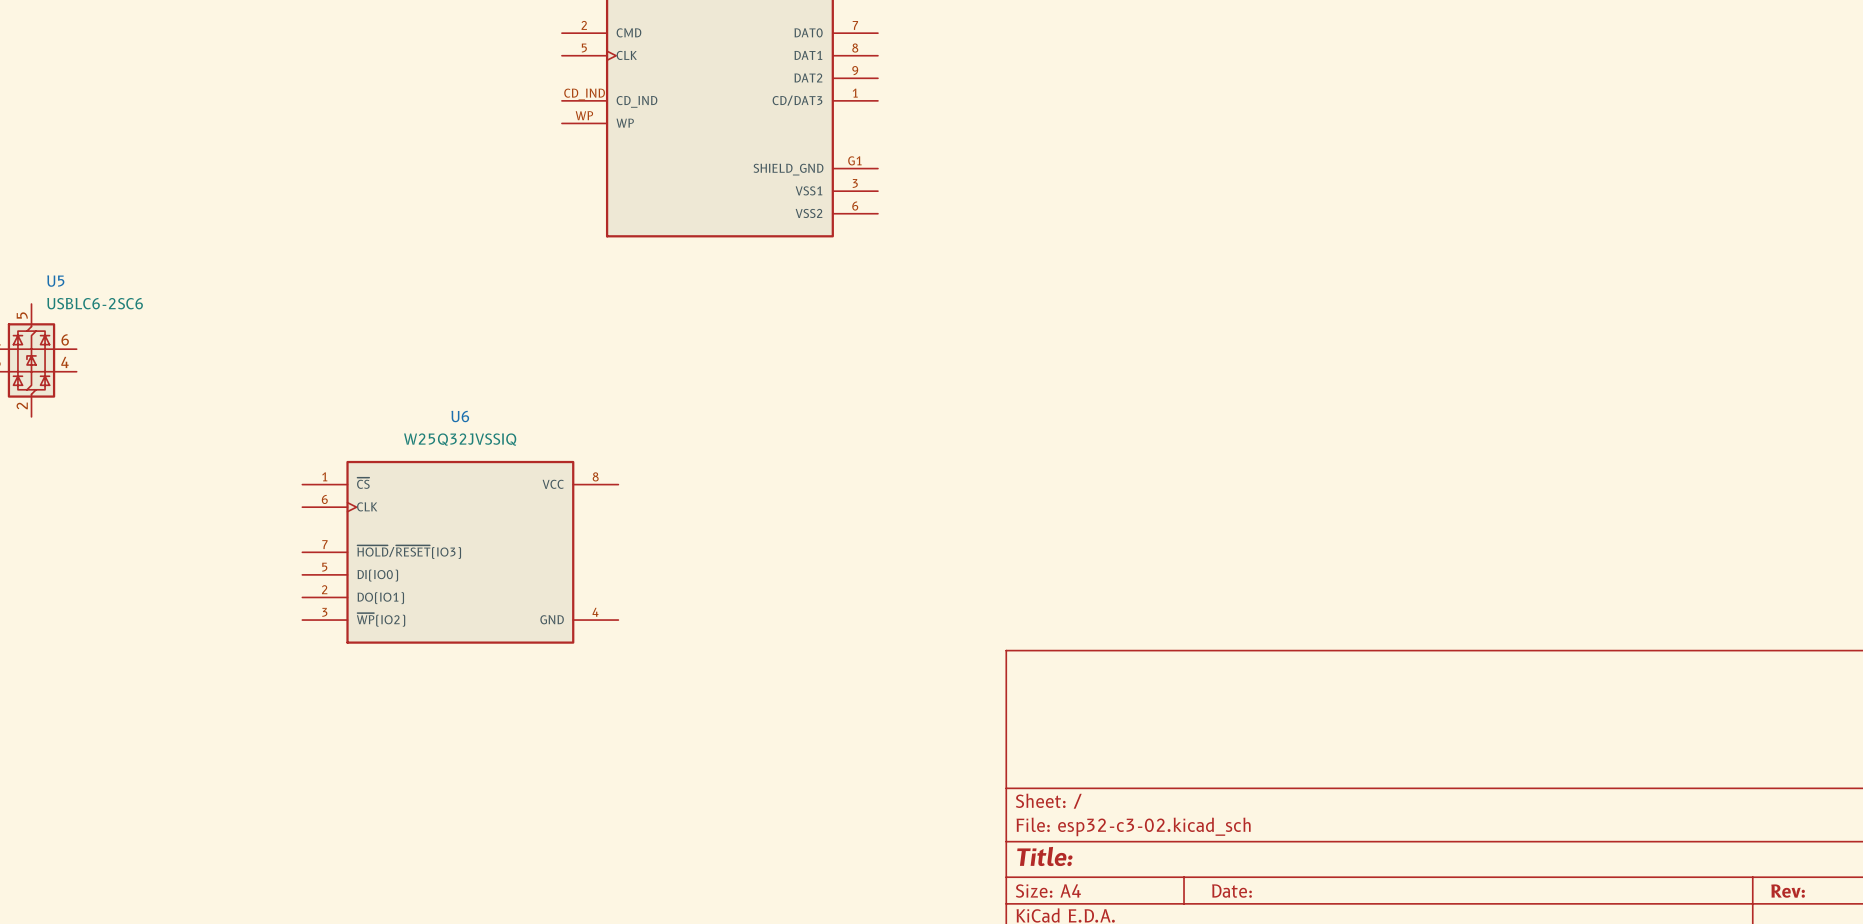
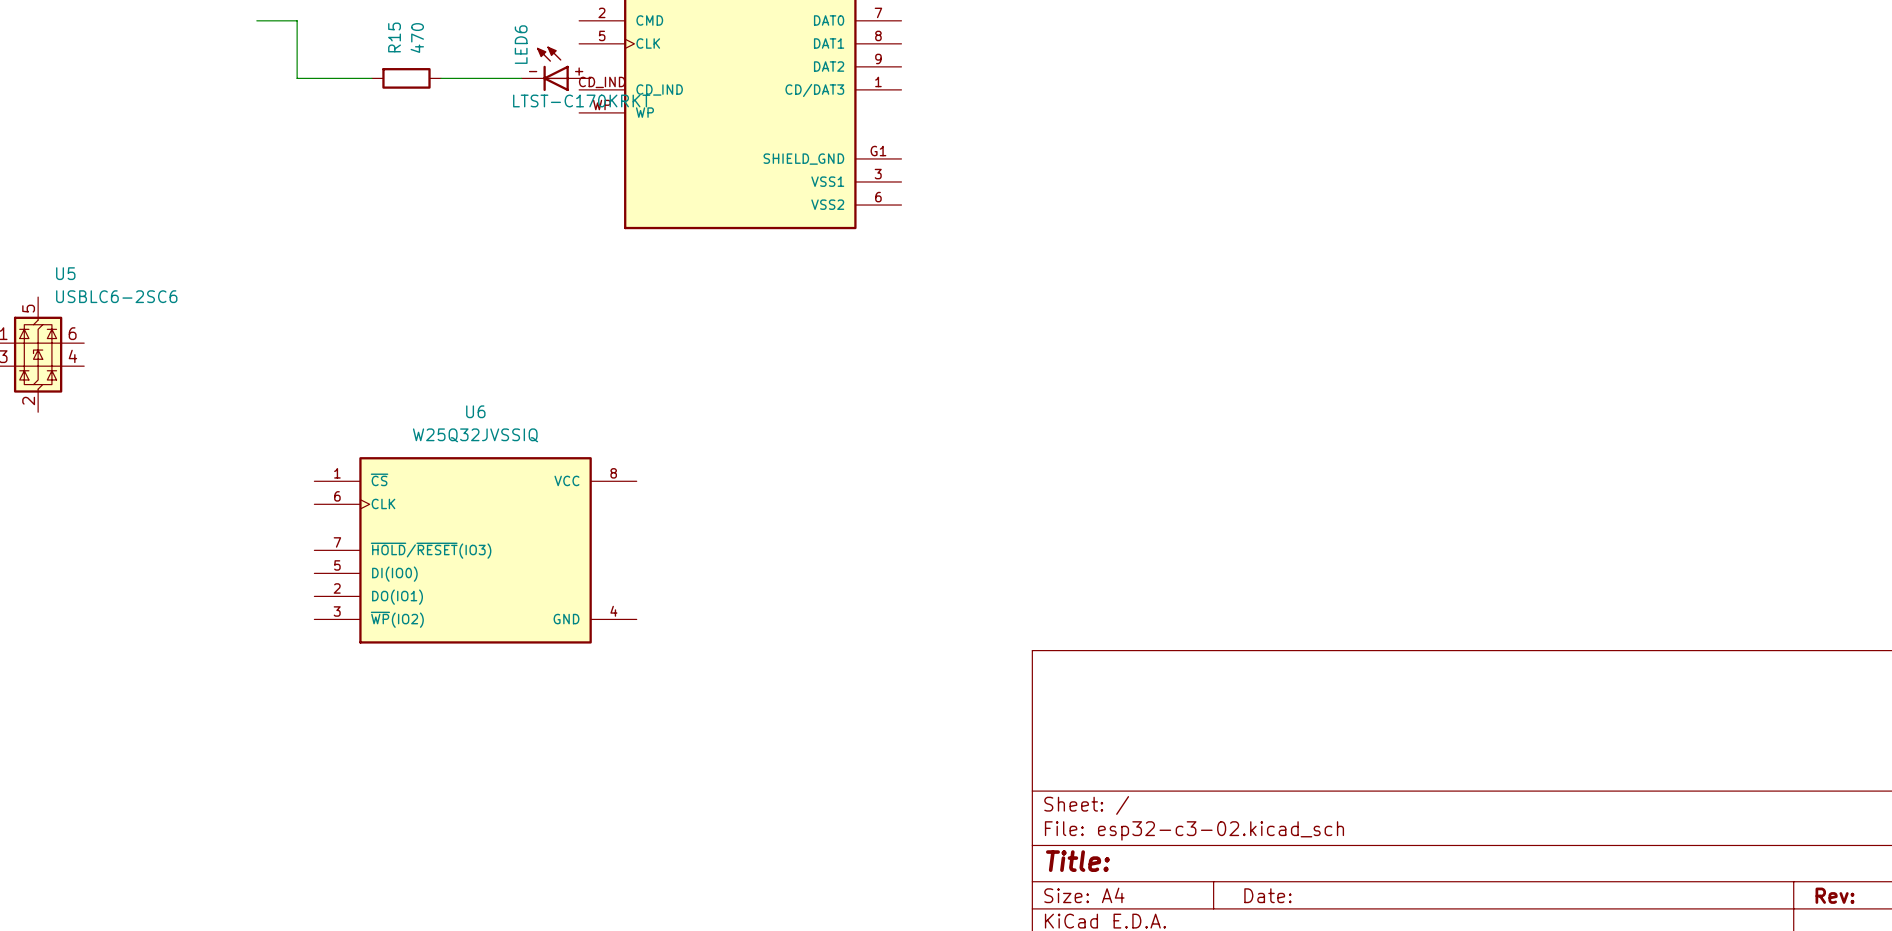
wire: none -> (256, 20) (297, 20) (297, 78) (371, 78)
LED6: none -> LTST-C170KRKT (556, 68)
R15: none -> 470 (406, 78)
wire: none -> (441, 78) (521, 78)

